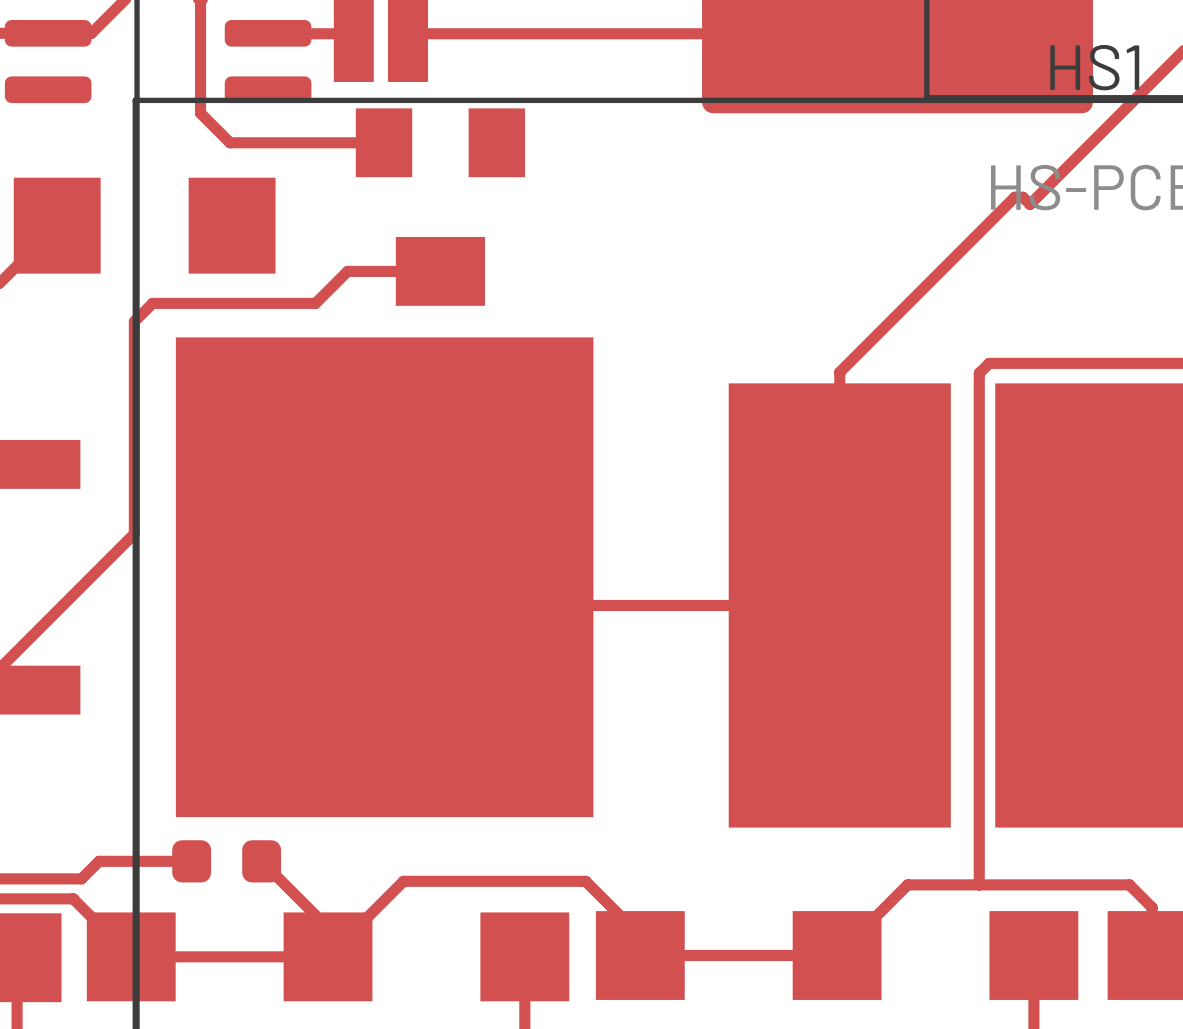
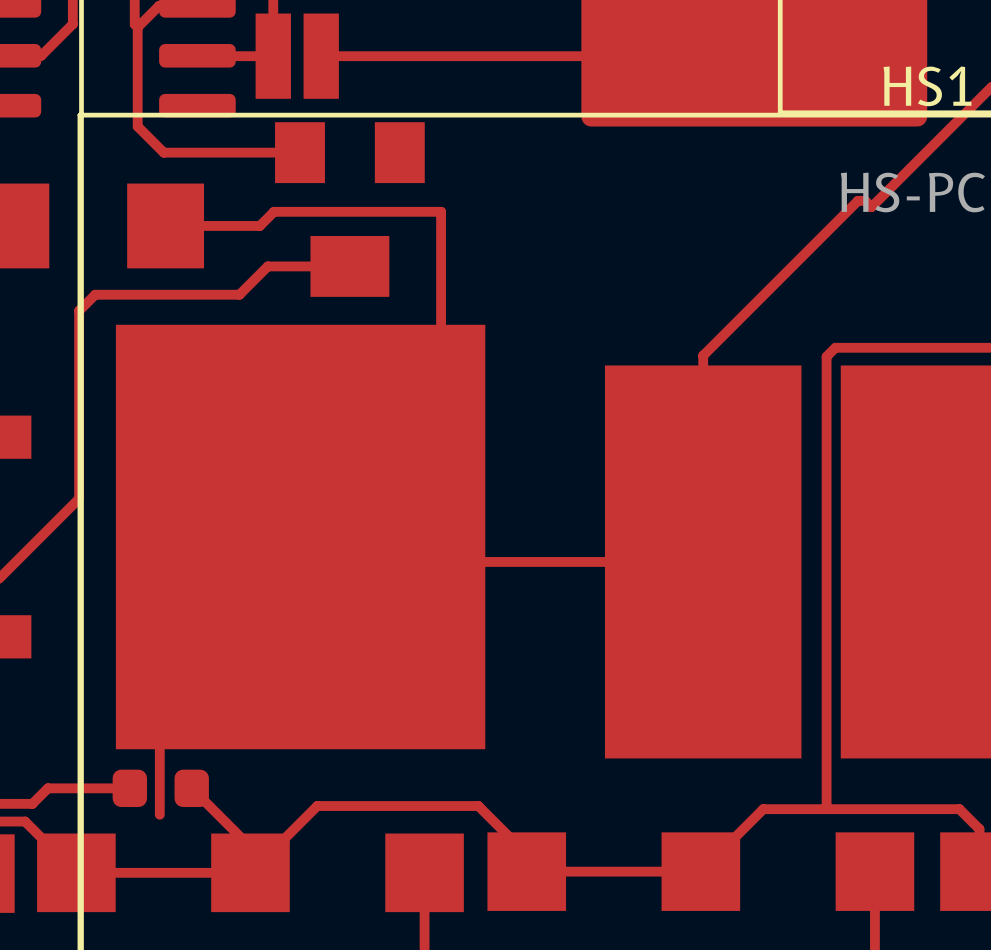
top track: none -> (165, 225) (259, 225) (274, 211) (441, 211) (441, 396) (300, 537) (279, 537) (159, 656) (159, 814)

